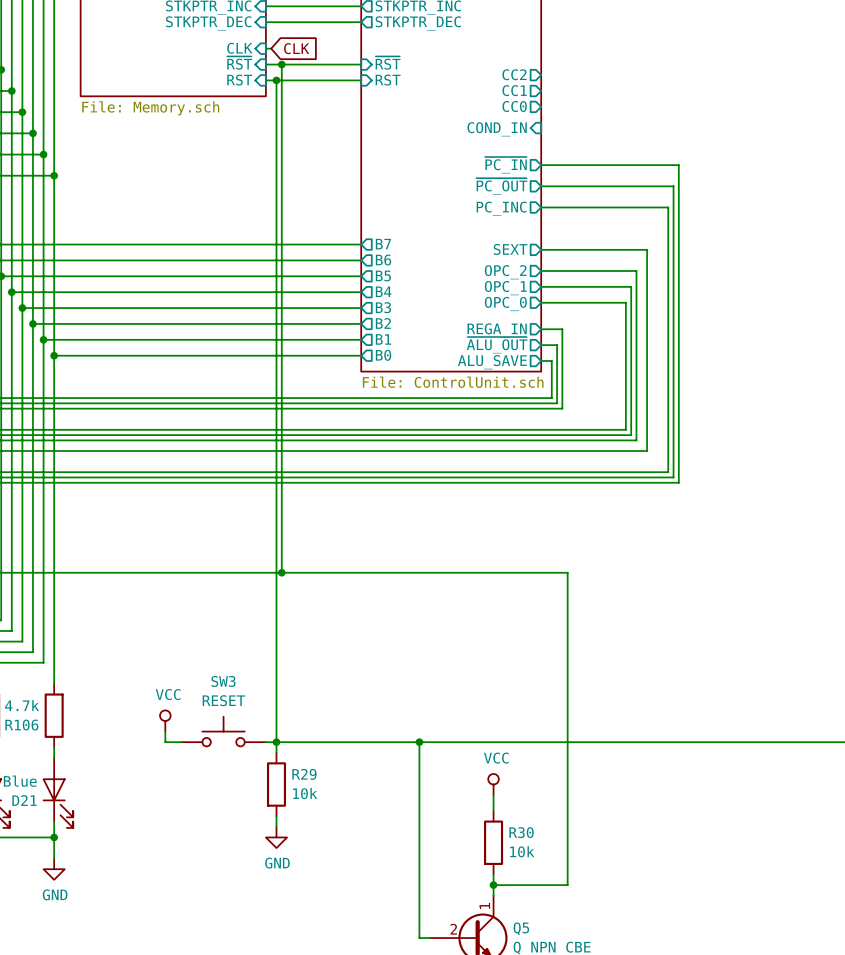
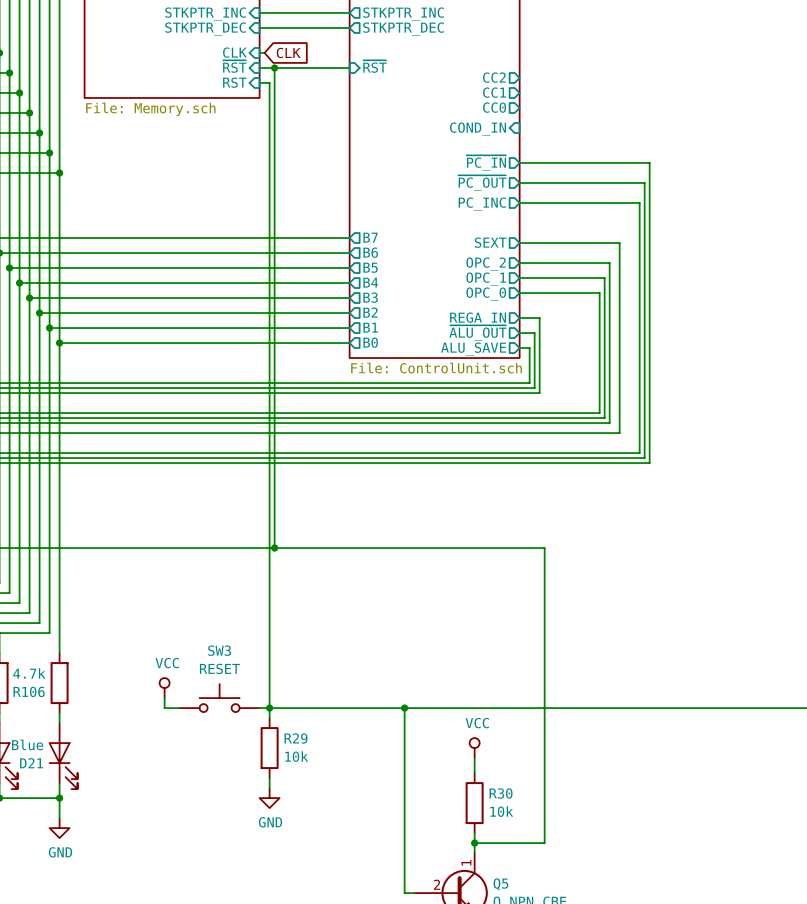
wire: (276, 80) (361, 80) -> none
junction: (276, 80) -> none
sheet pin: RST (388, 80) -> none

